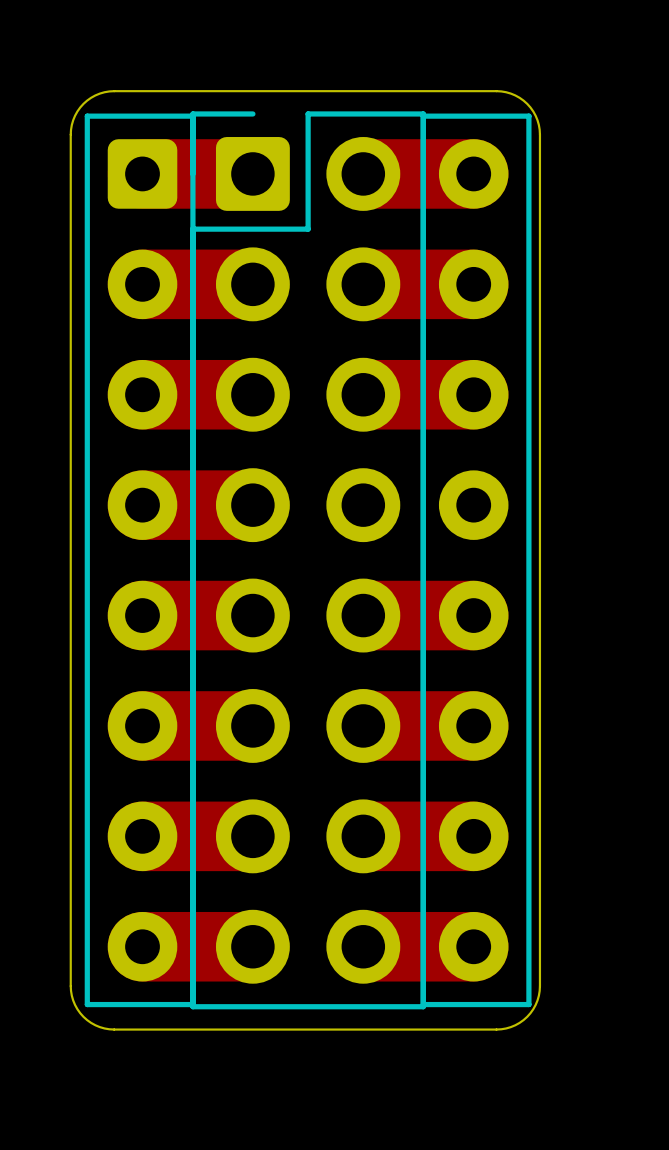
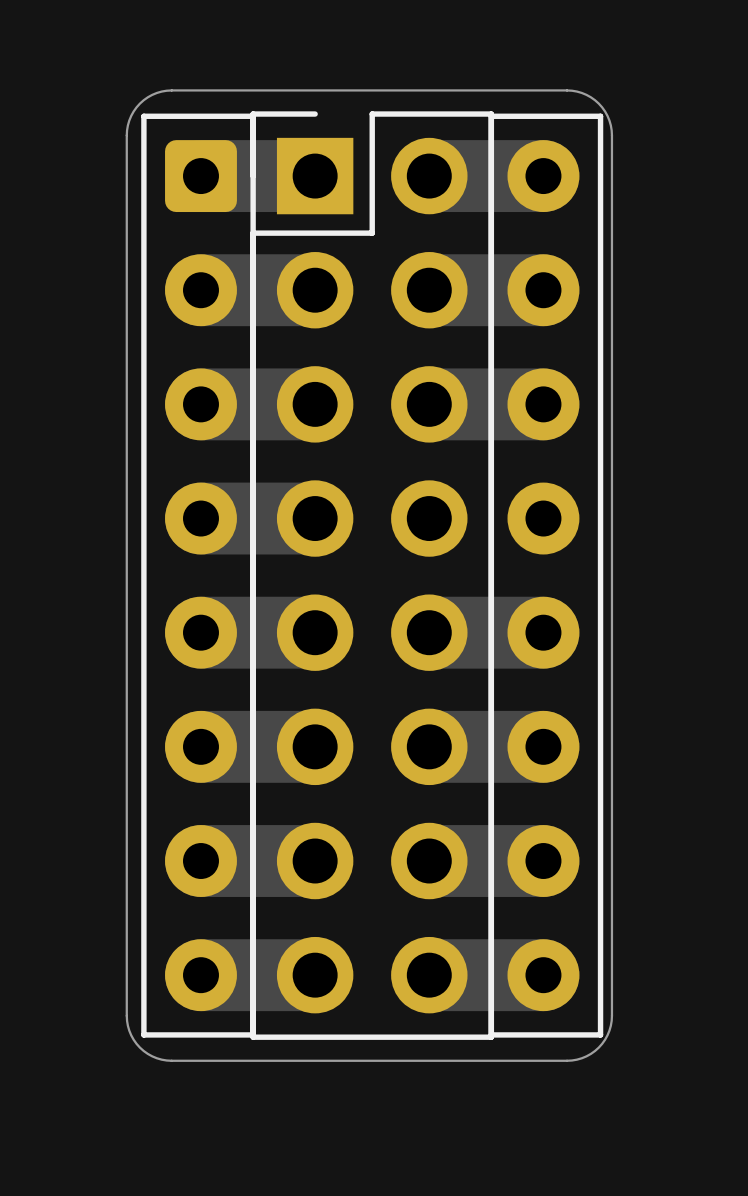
part footprint: [190, 111, 426, 1010] -> [250, 111, 495, 1040]

